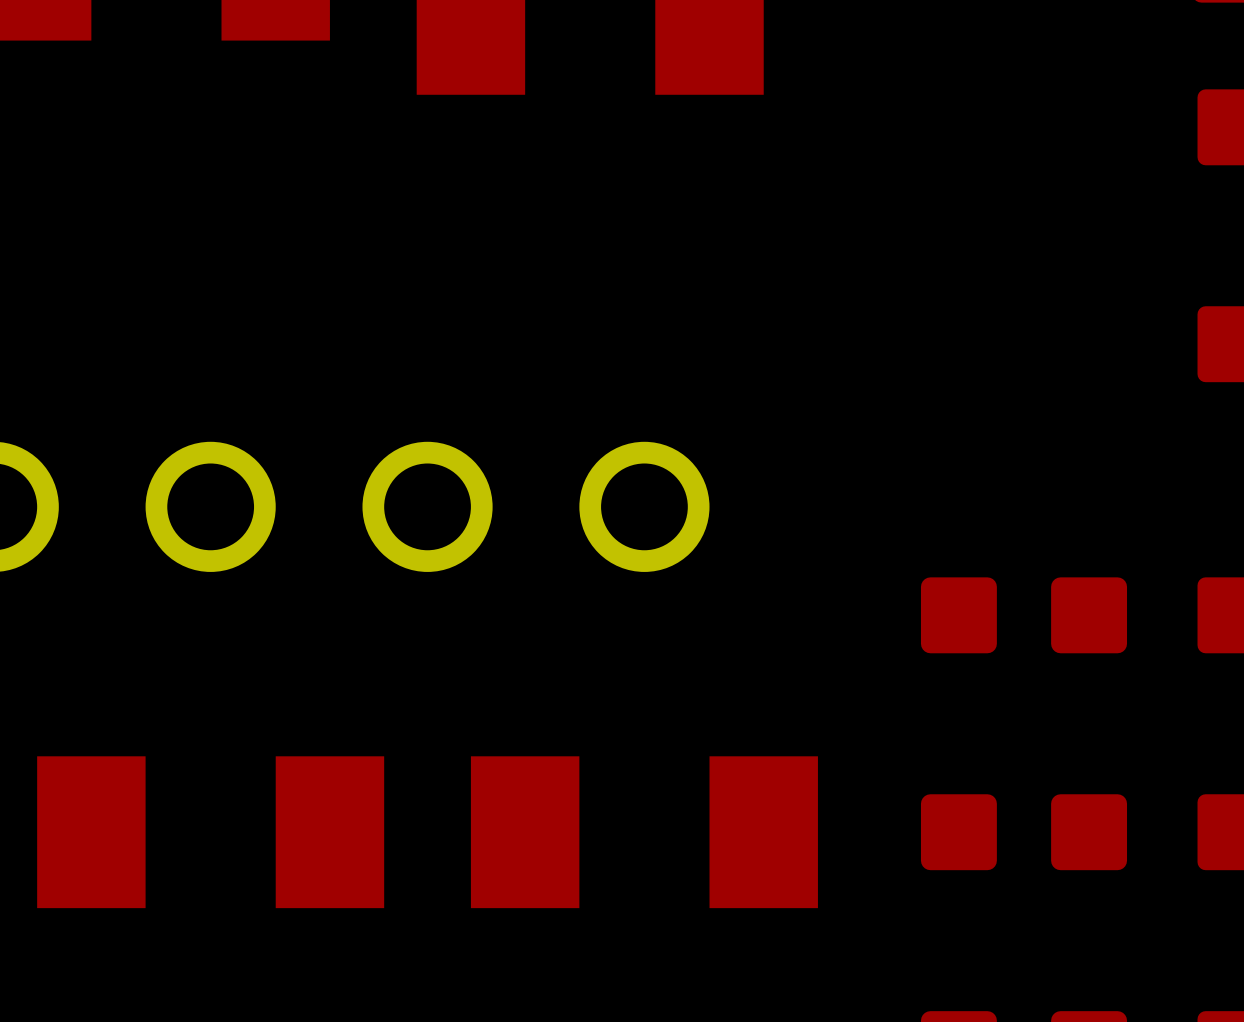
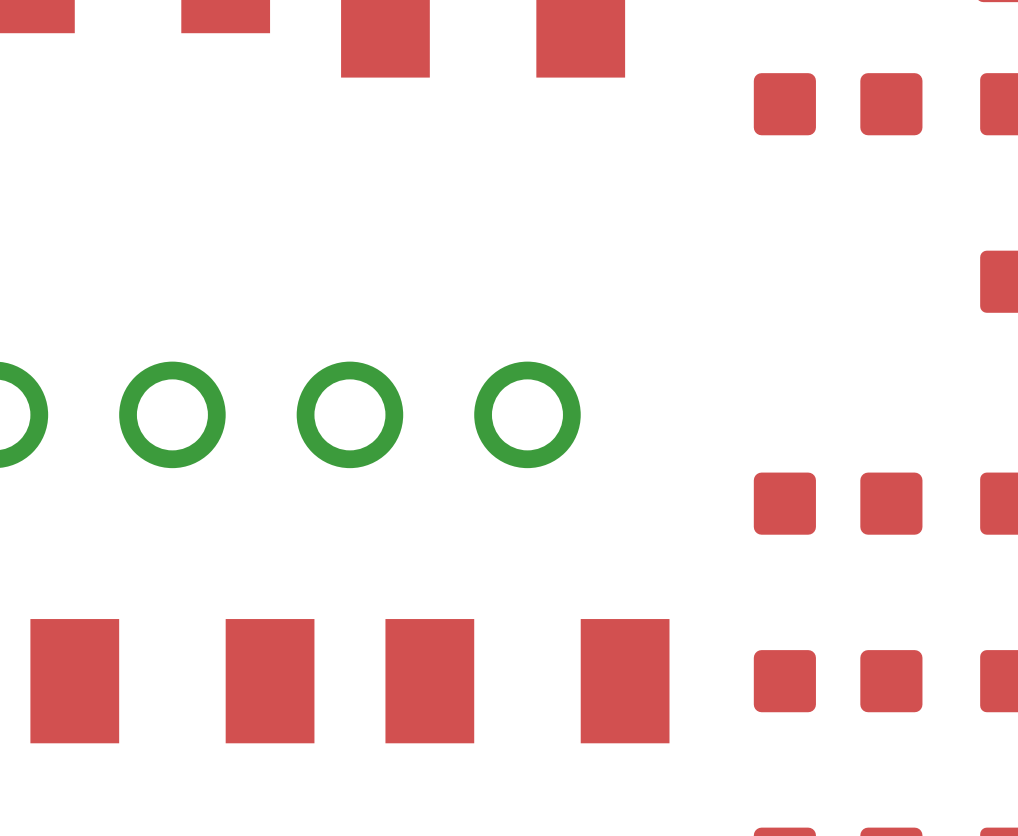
part: none -> (838, 104)

